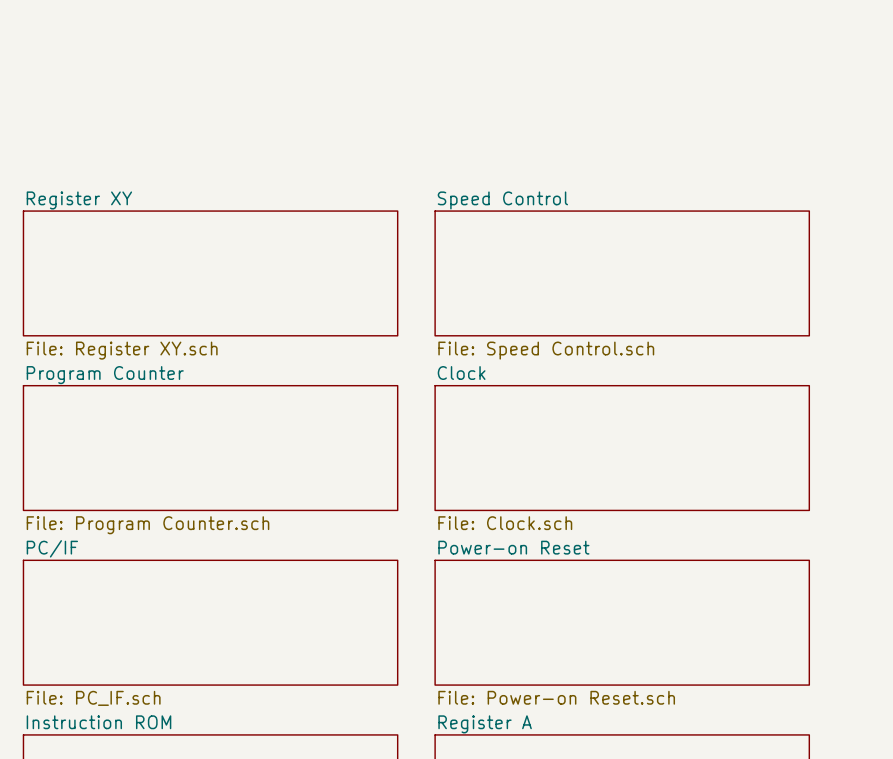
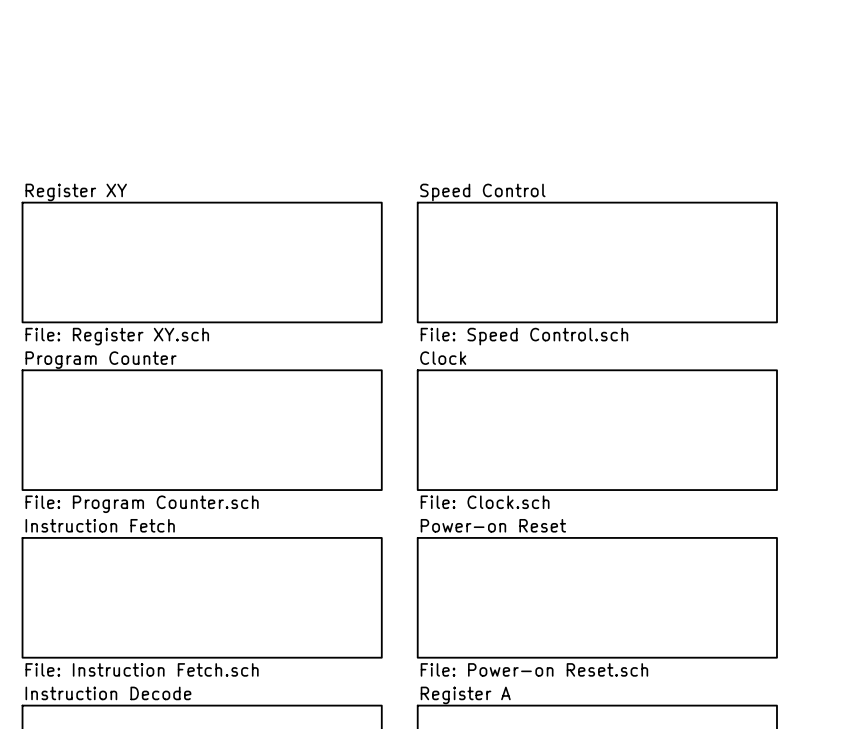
sheet PC/IF name: PC/IF (52, 548) -> Instruction Fetch (100, 525)
sheet PC/IF value: File: PC_IF.sch (93, 698) -> File: Instruction Fetch.sch (142, 669)
sheet Instruction ROM name: Instruction ROM (98, 722) -> Instruction Decode (108, 693)

